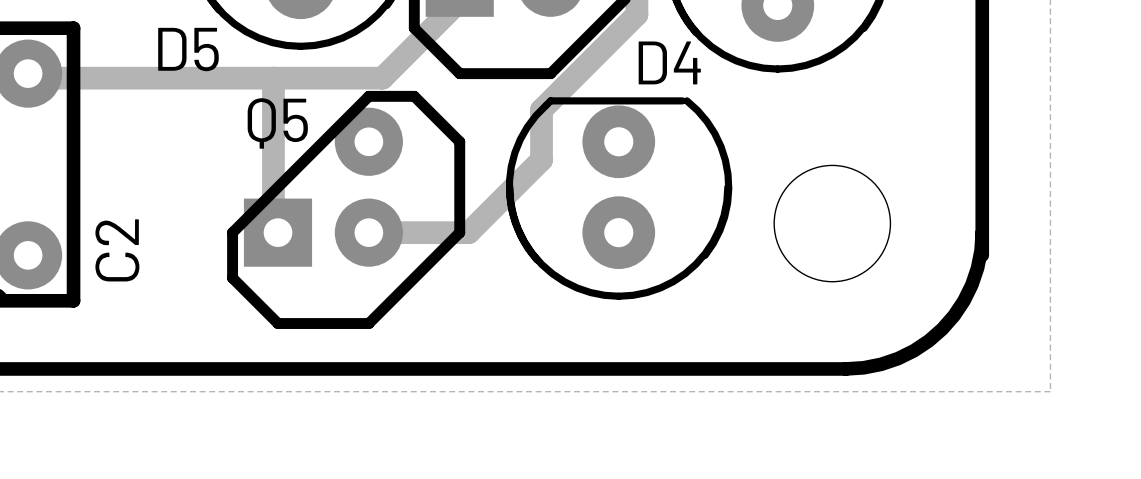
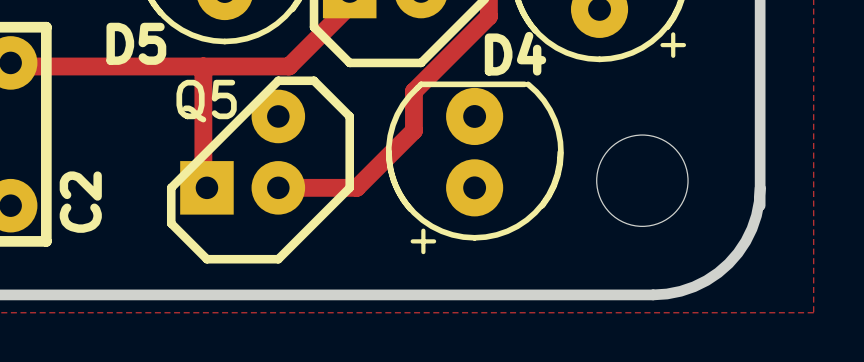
part text: none -> + (673, 45)
D4 text: none -> + (423, 241)

